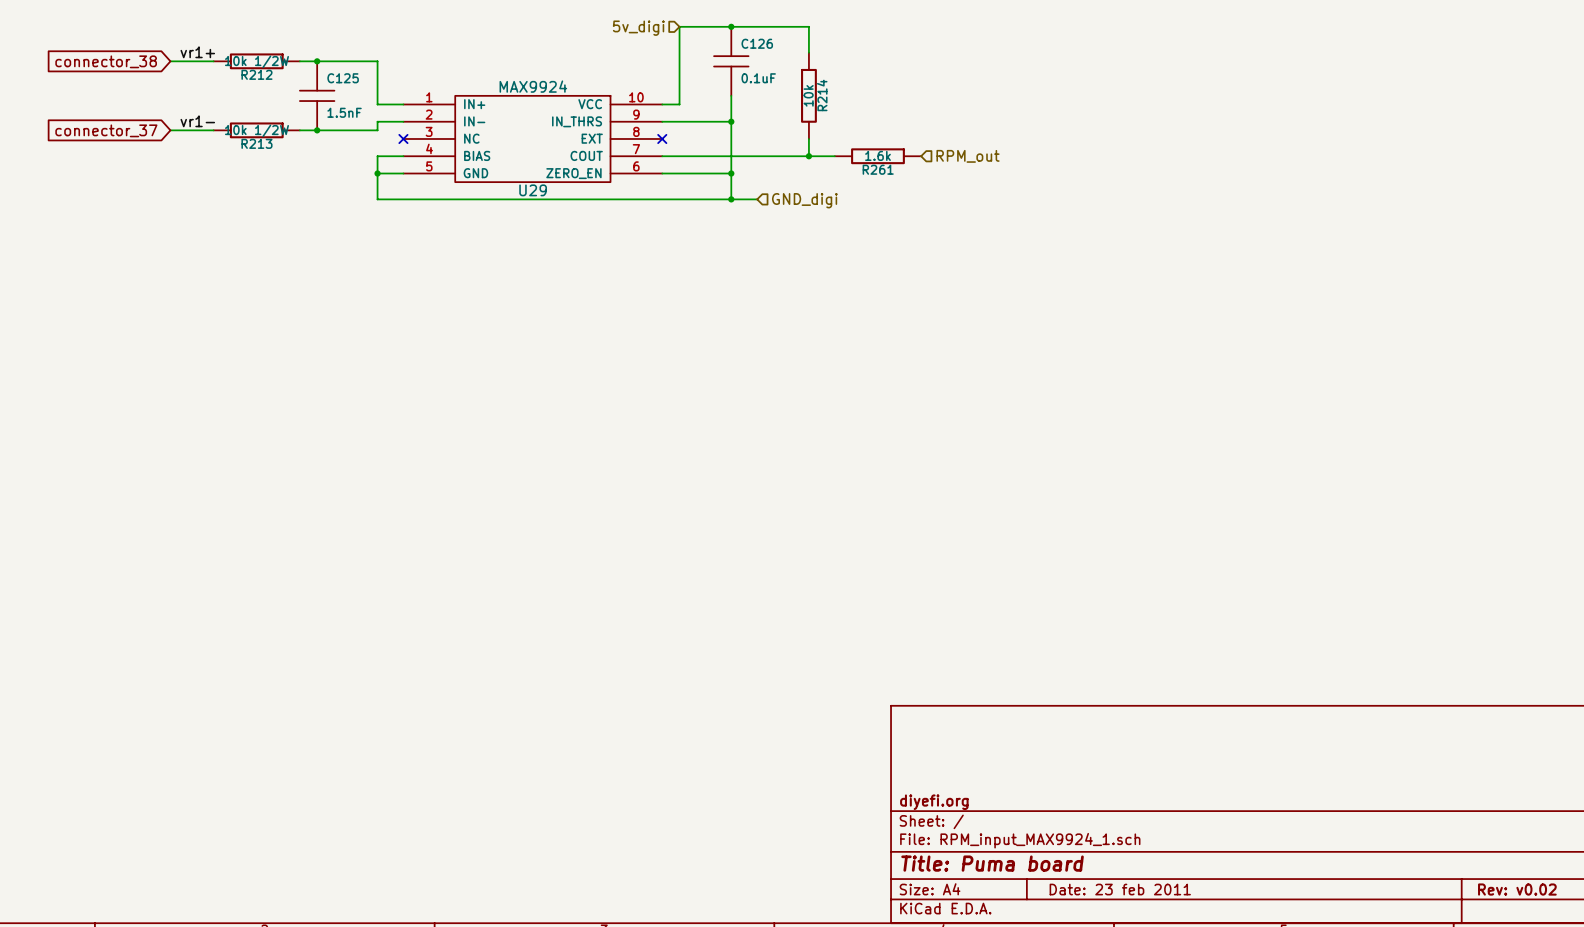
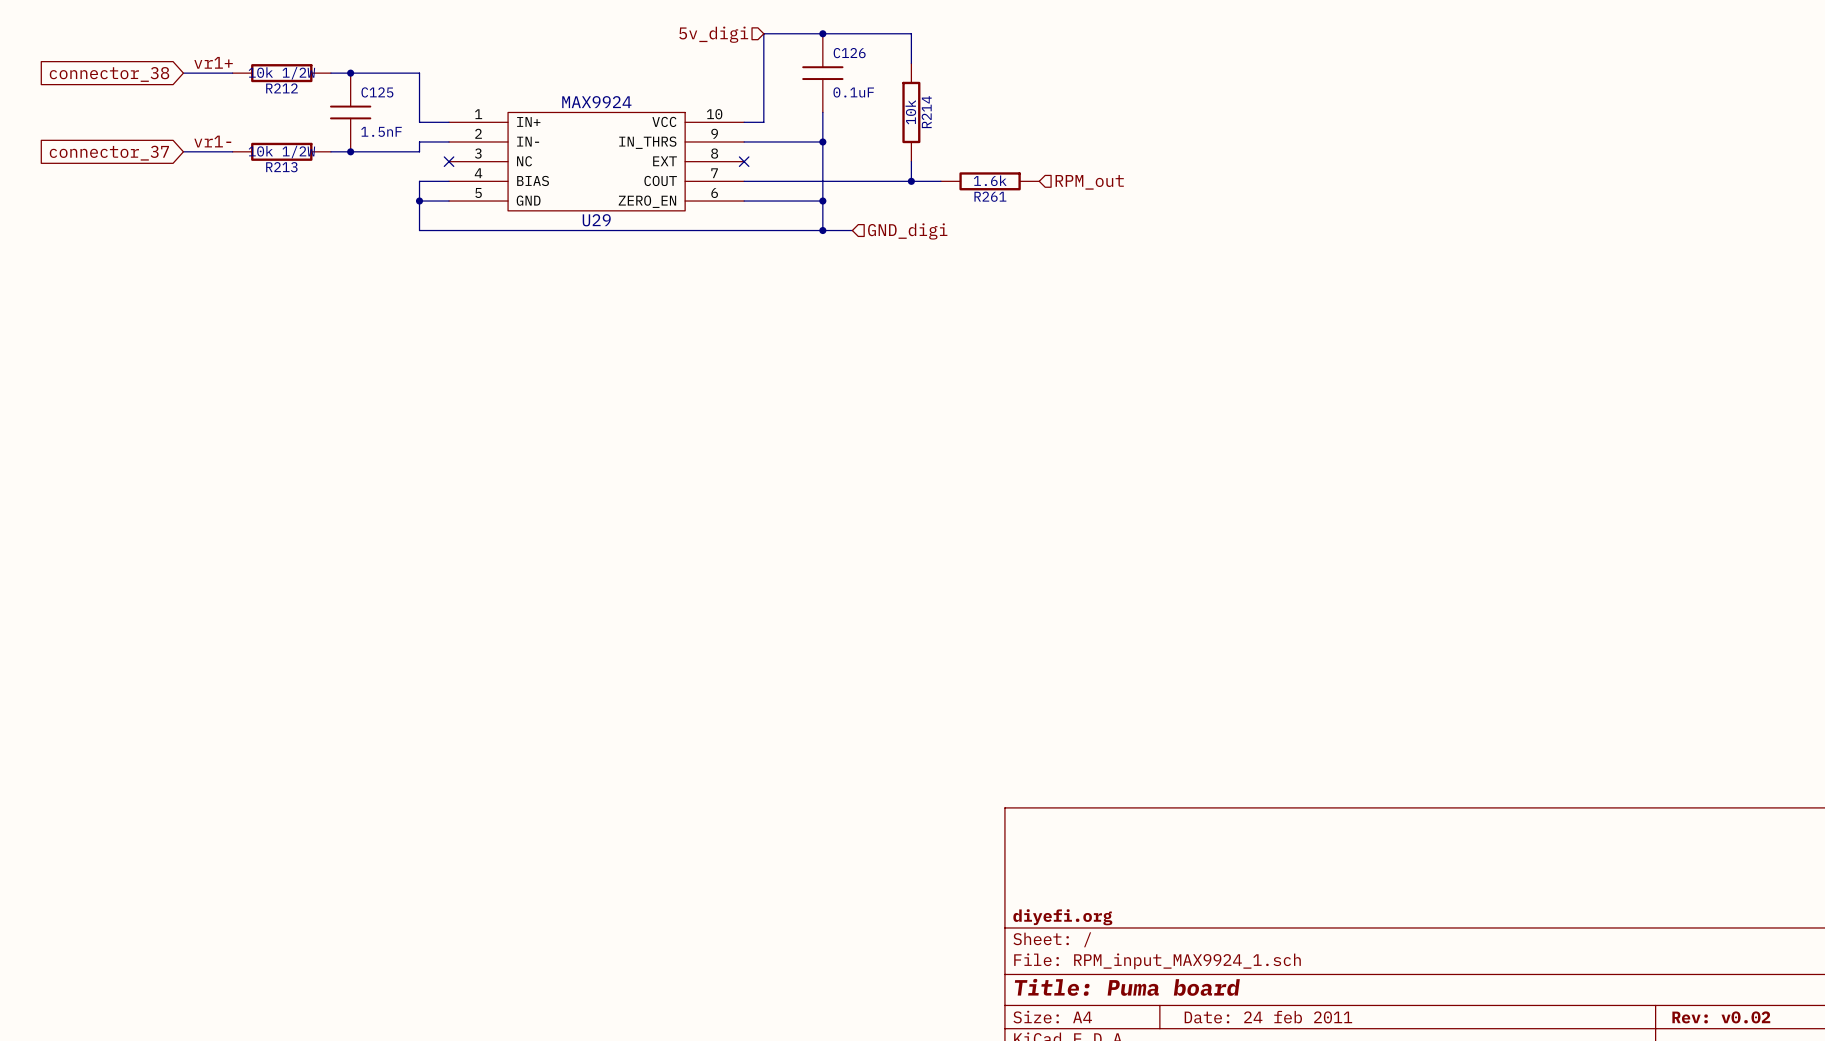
title block: Date: 23 feb 2011 (1120, 889) -> Date: 24 feb 2011 (1268, 1017)

